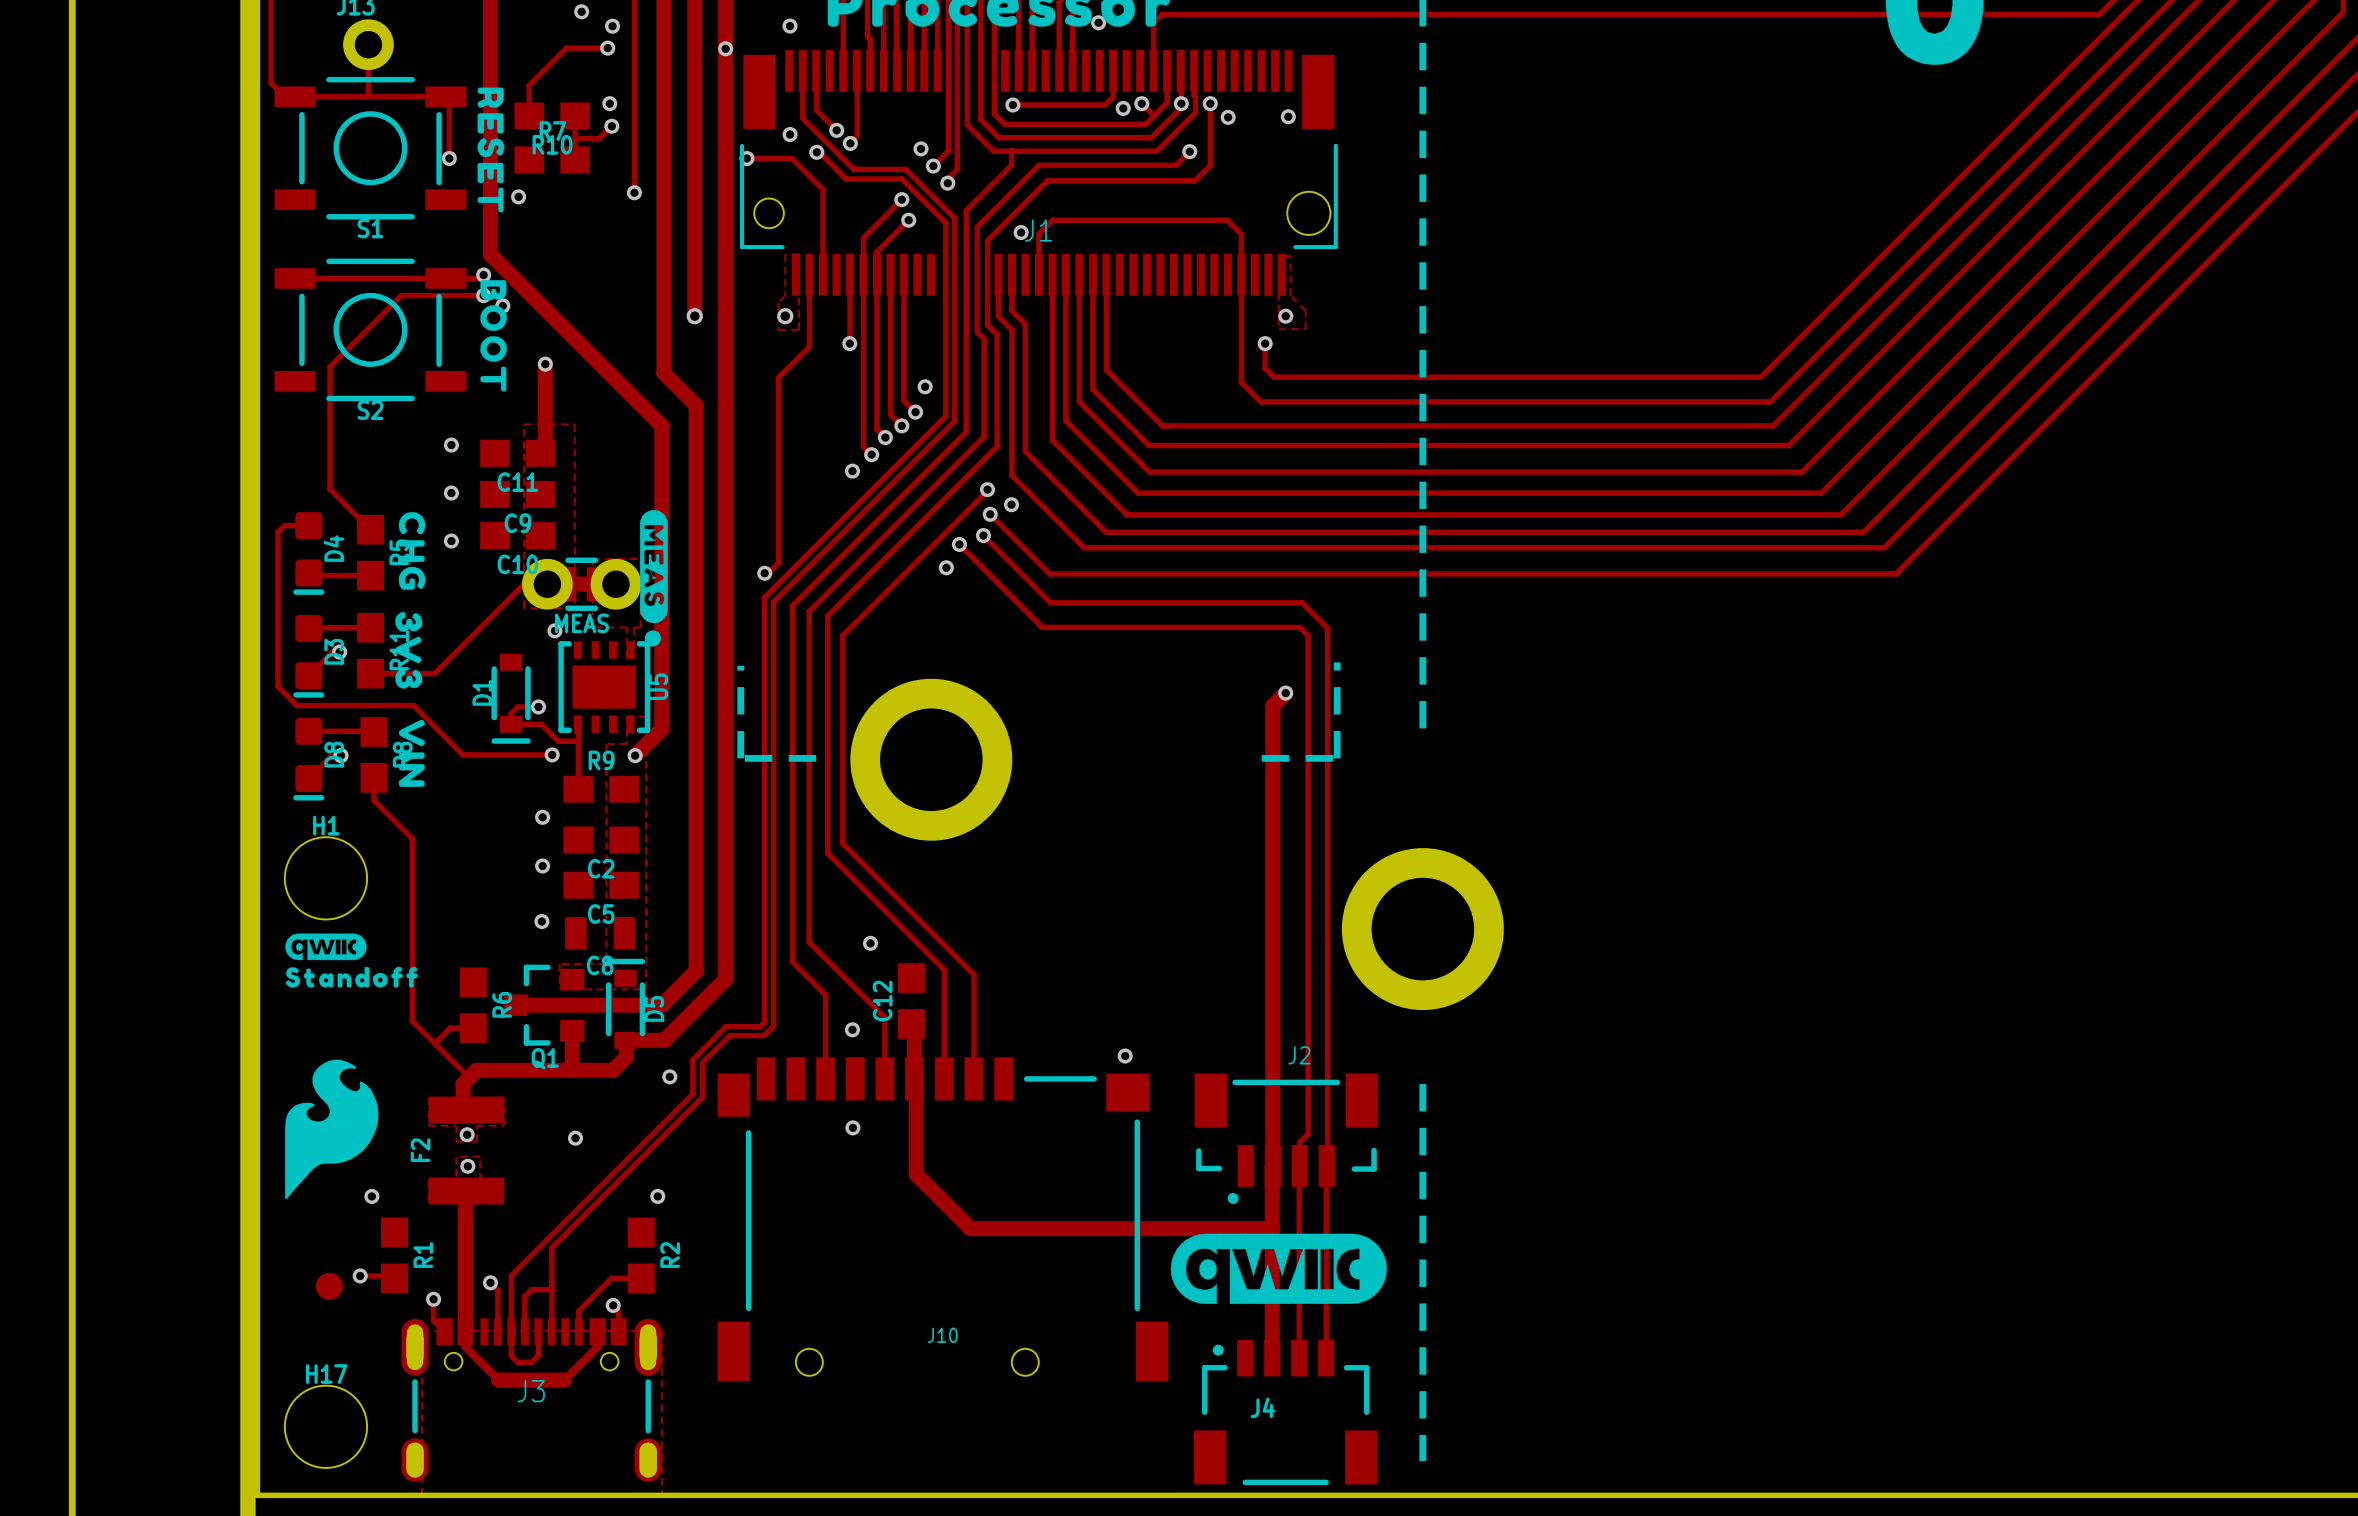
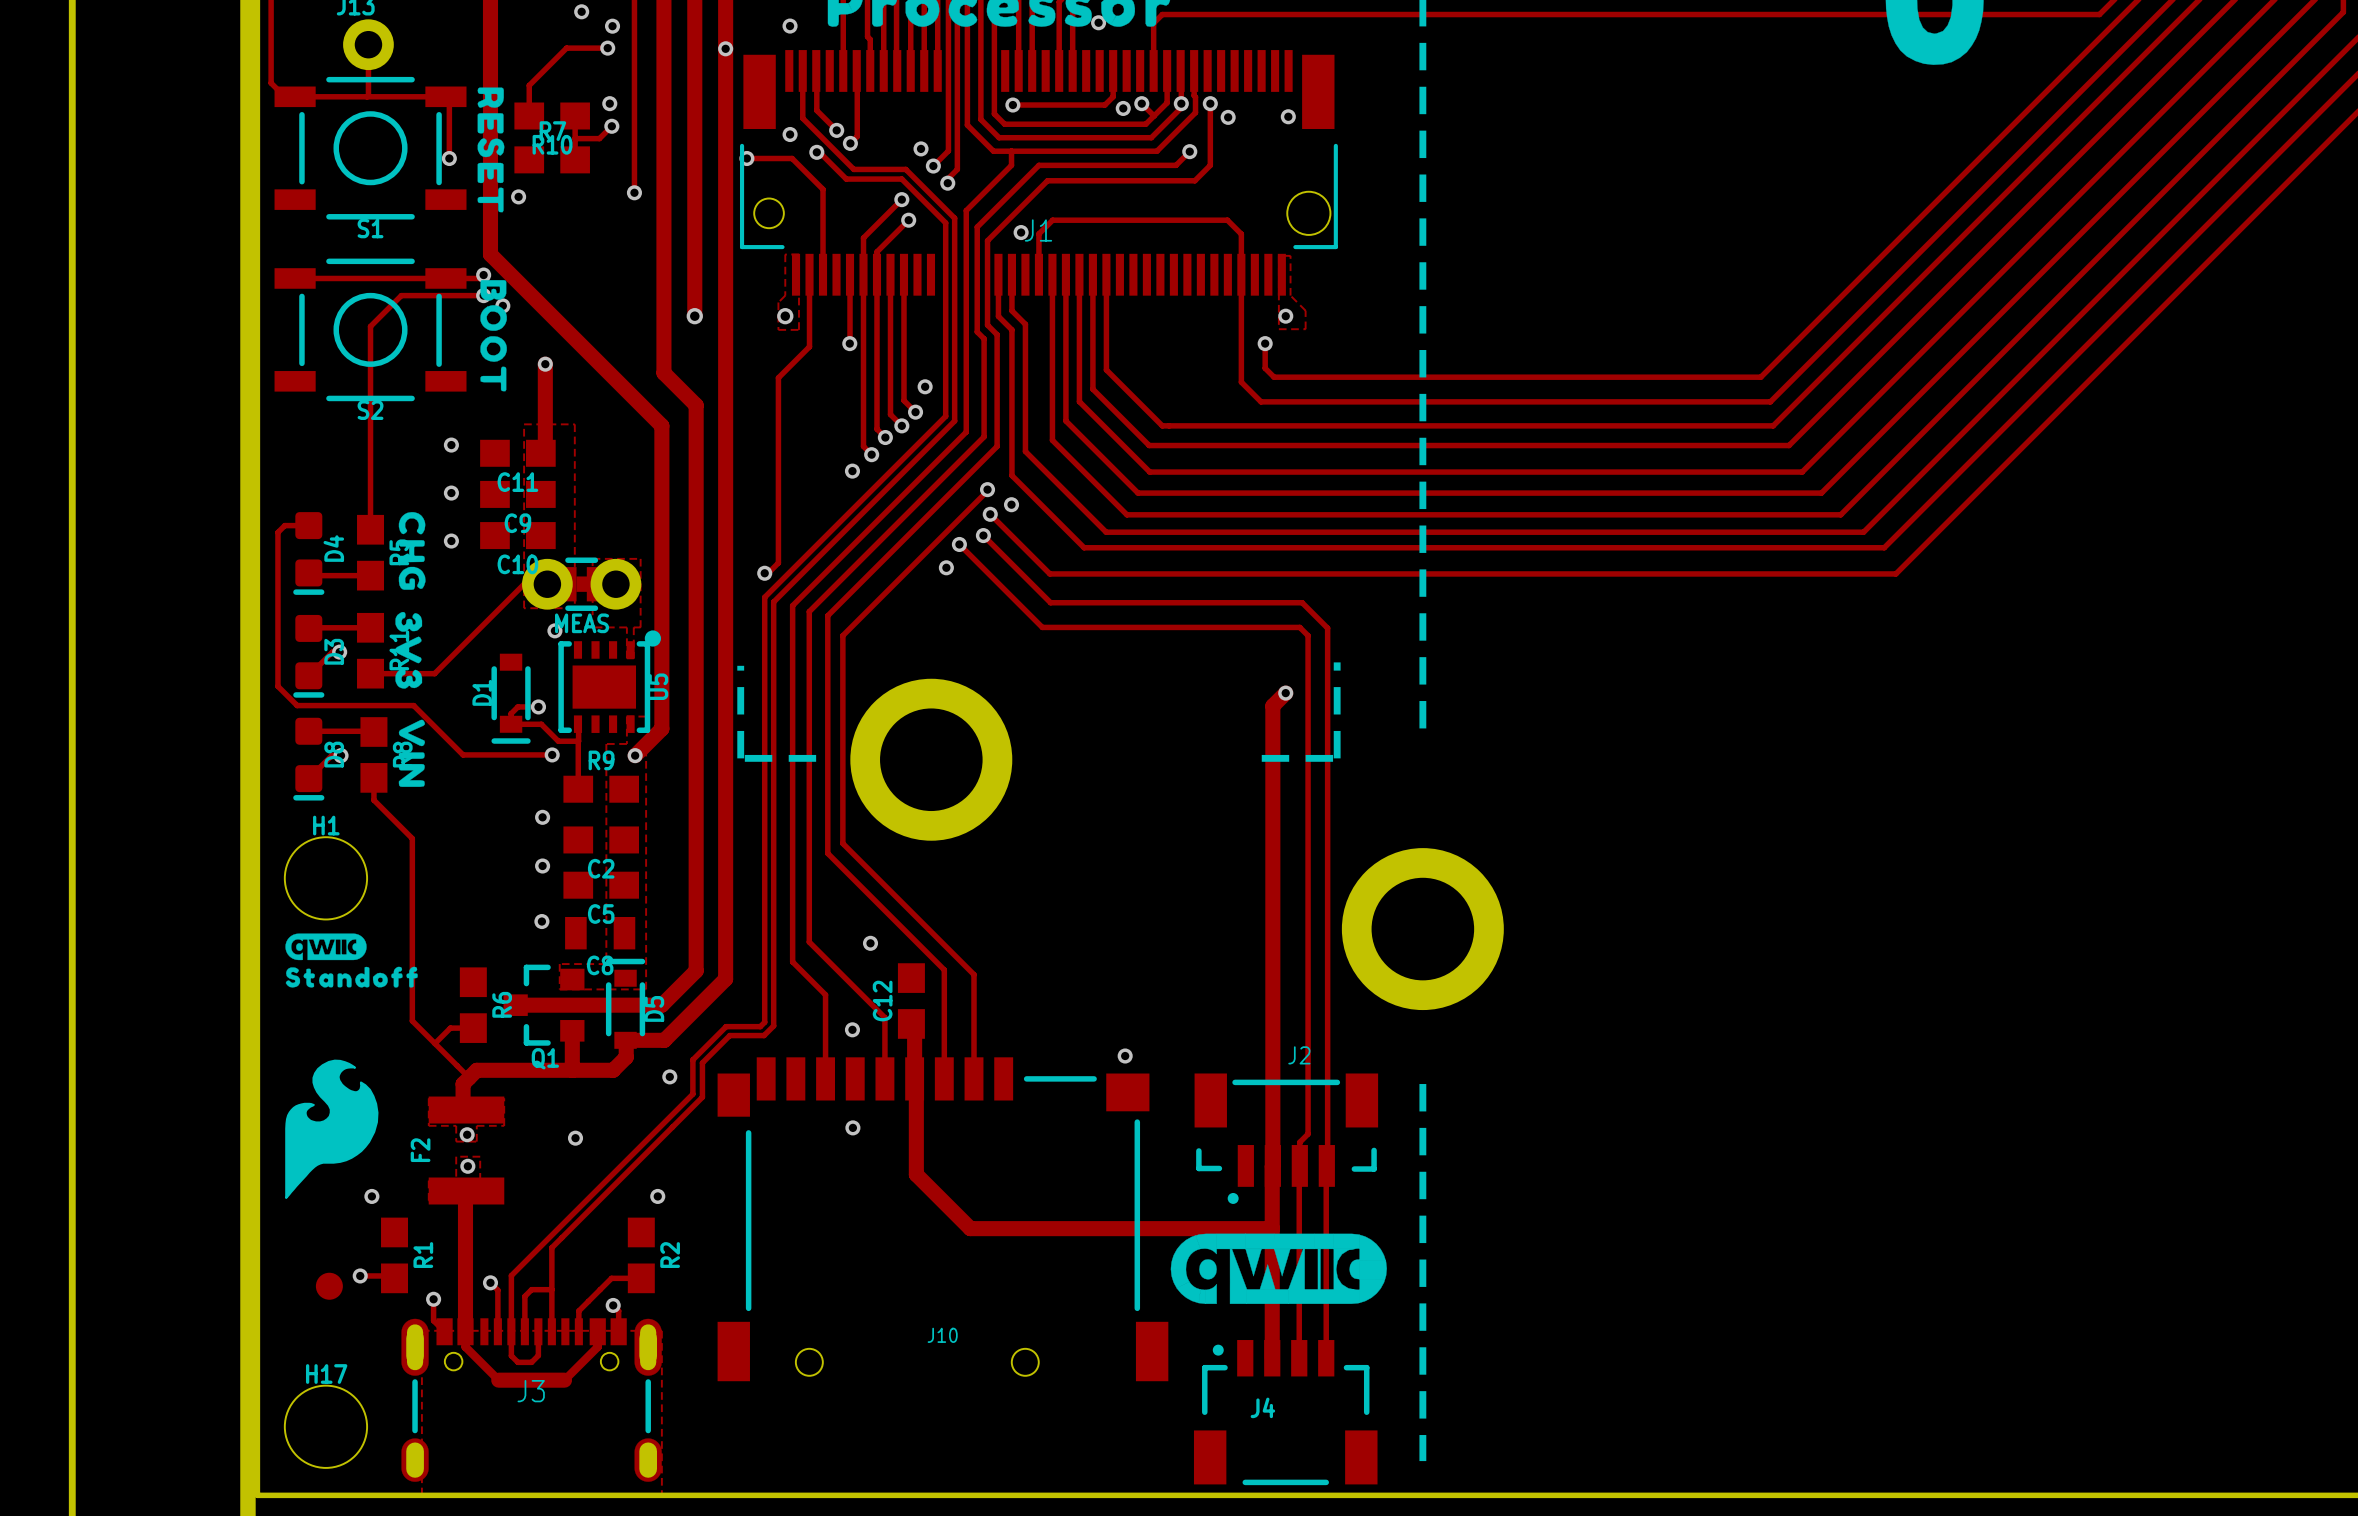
track: (370, 326) (330, 366) (330, 489) (370, 529) -> (370, 326) (370, 529)
drawing: [639, 510, 668, 624] -> none

